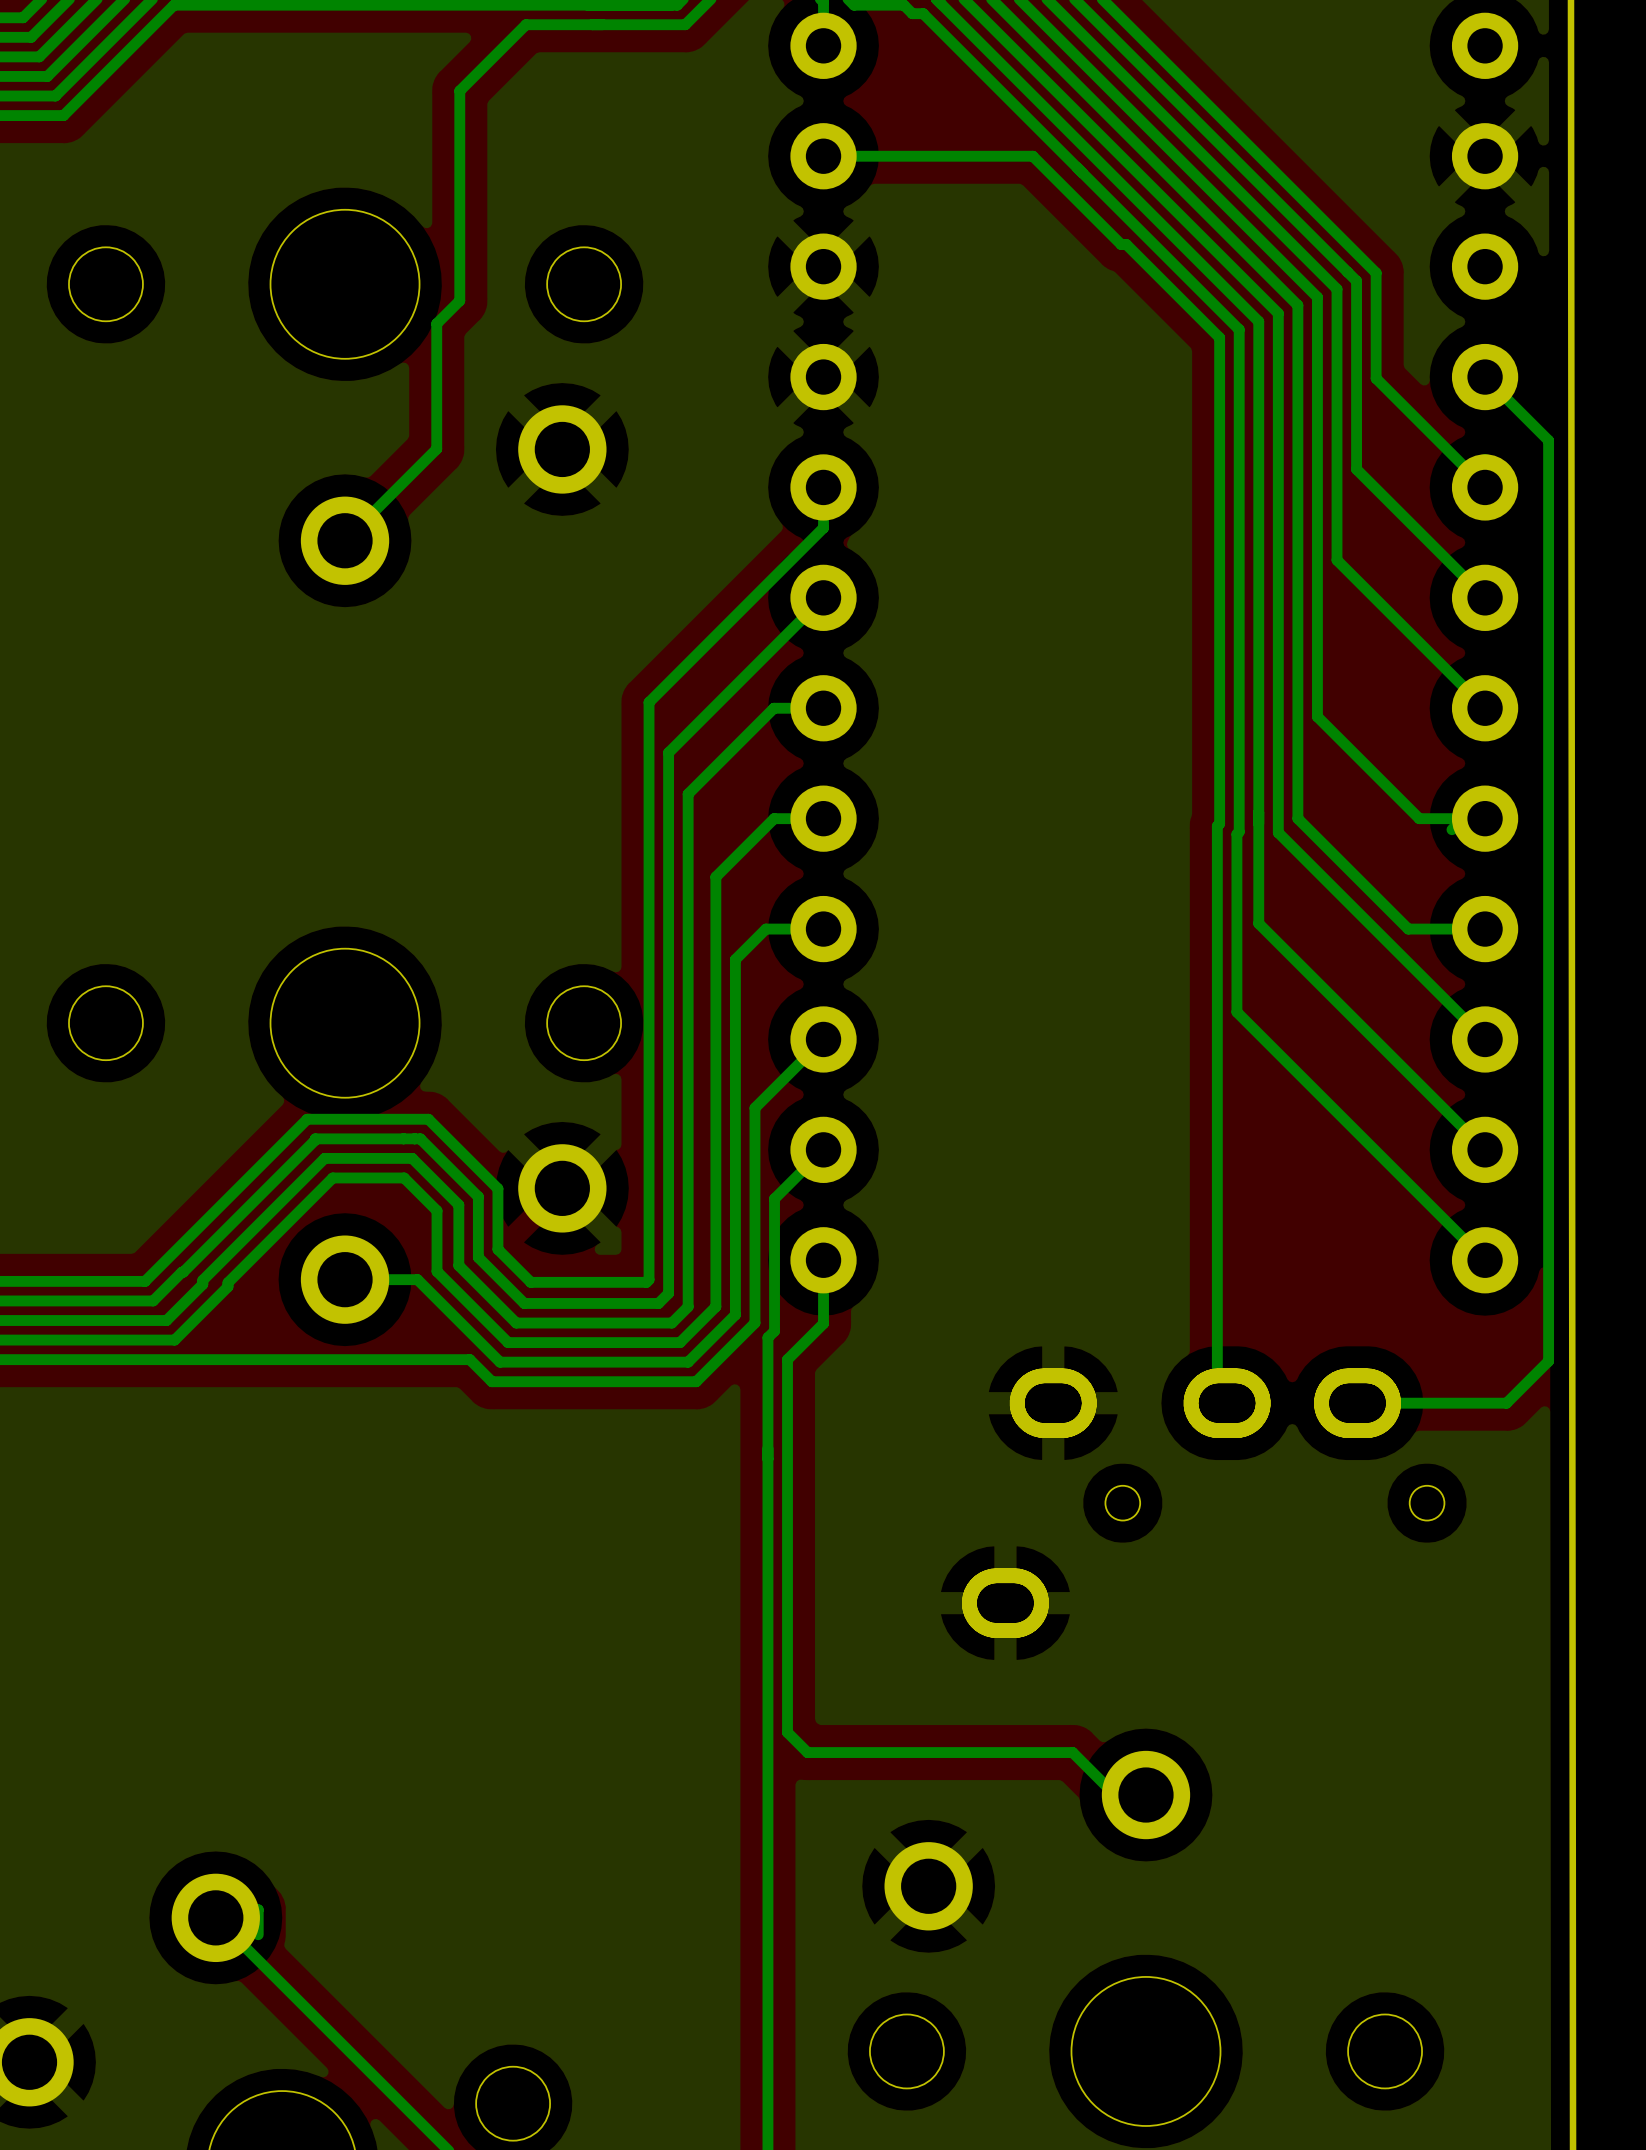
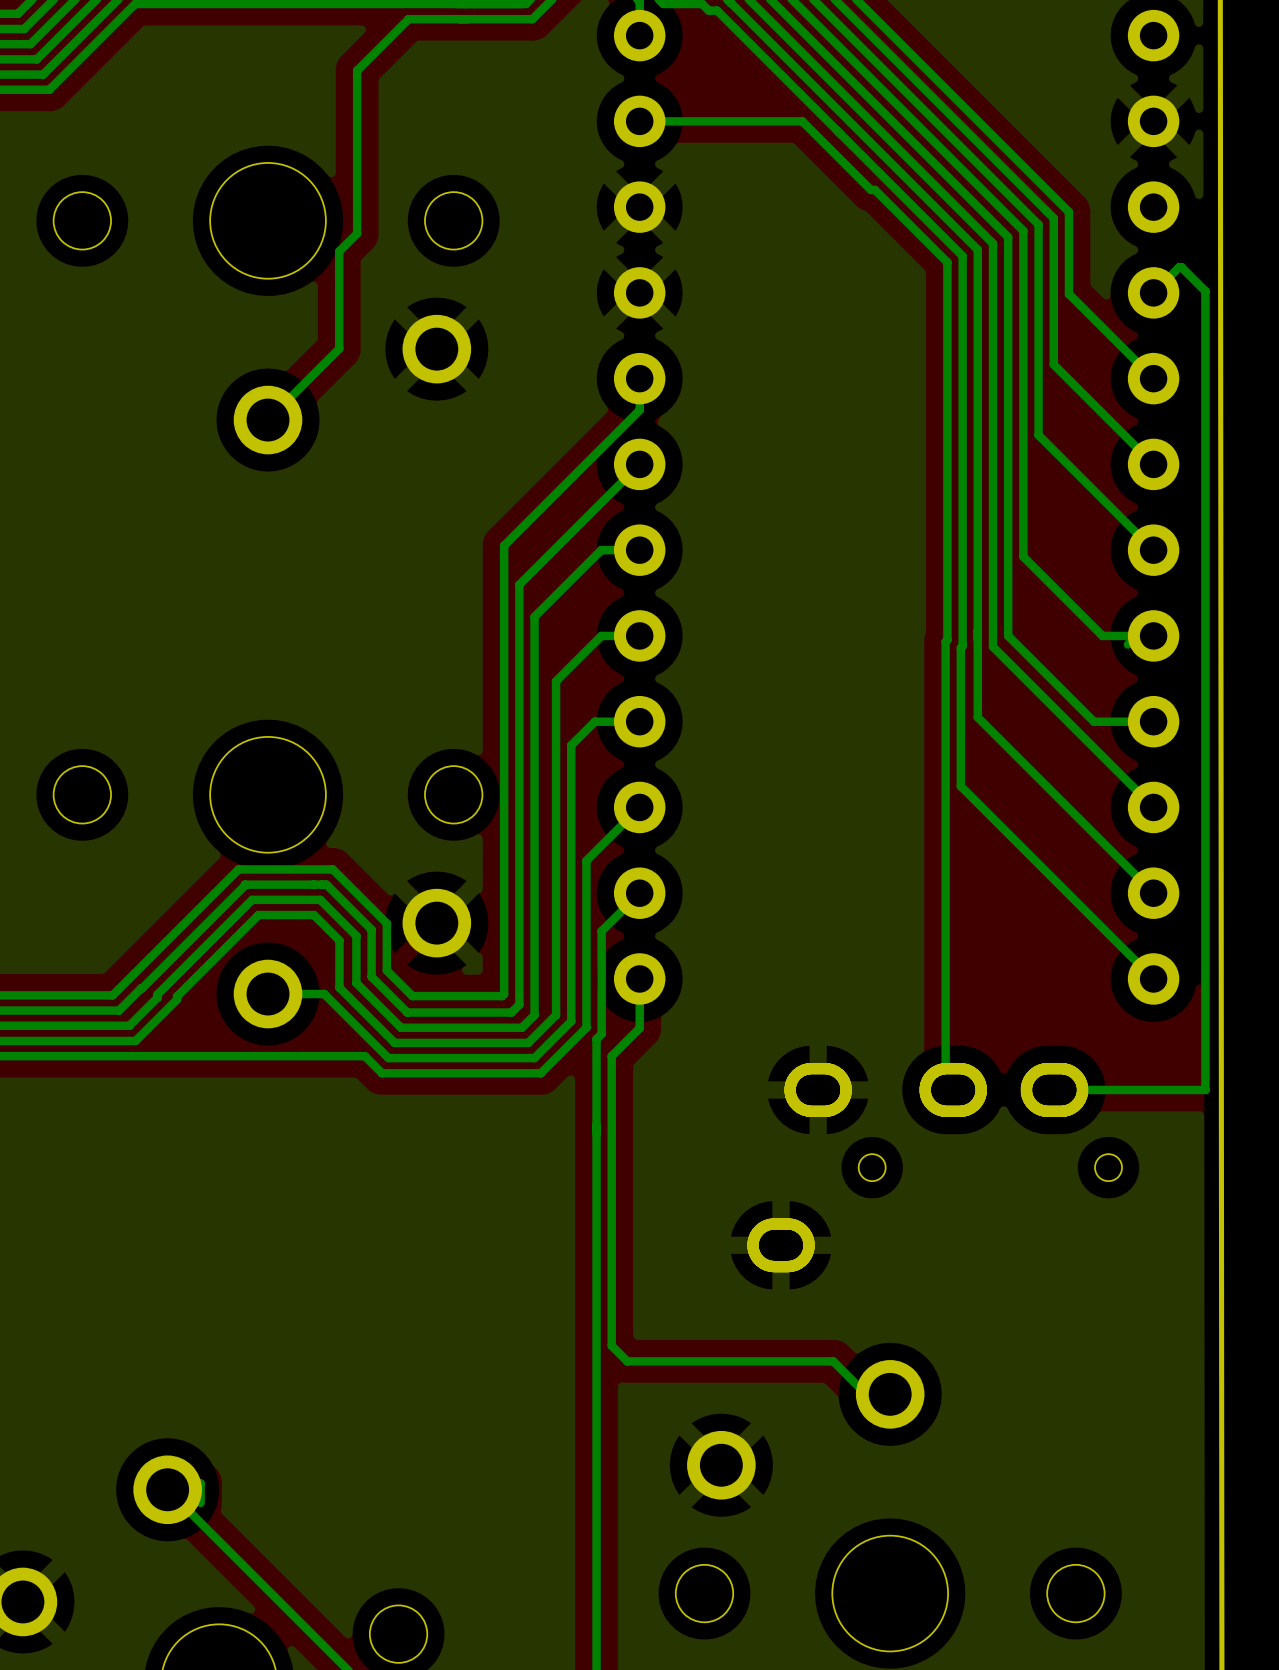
bottom track: (1485, 377) (1548, 440) (1548, 1361) (1506, 1403) -> (1153, 292) (1179, 267) (1205, 291) (1205, 1089) (1170, 1089)

